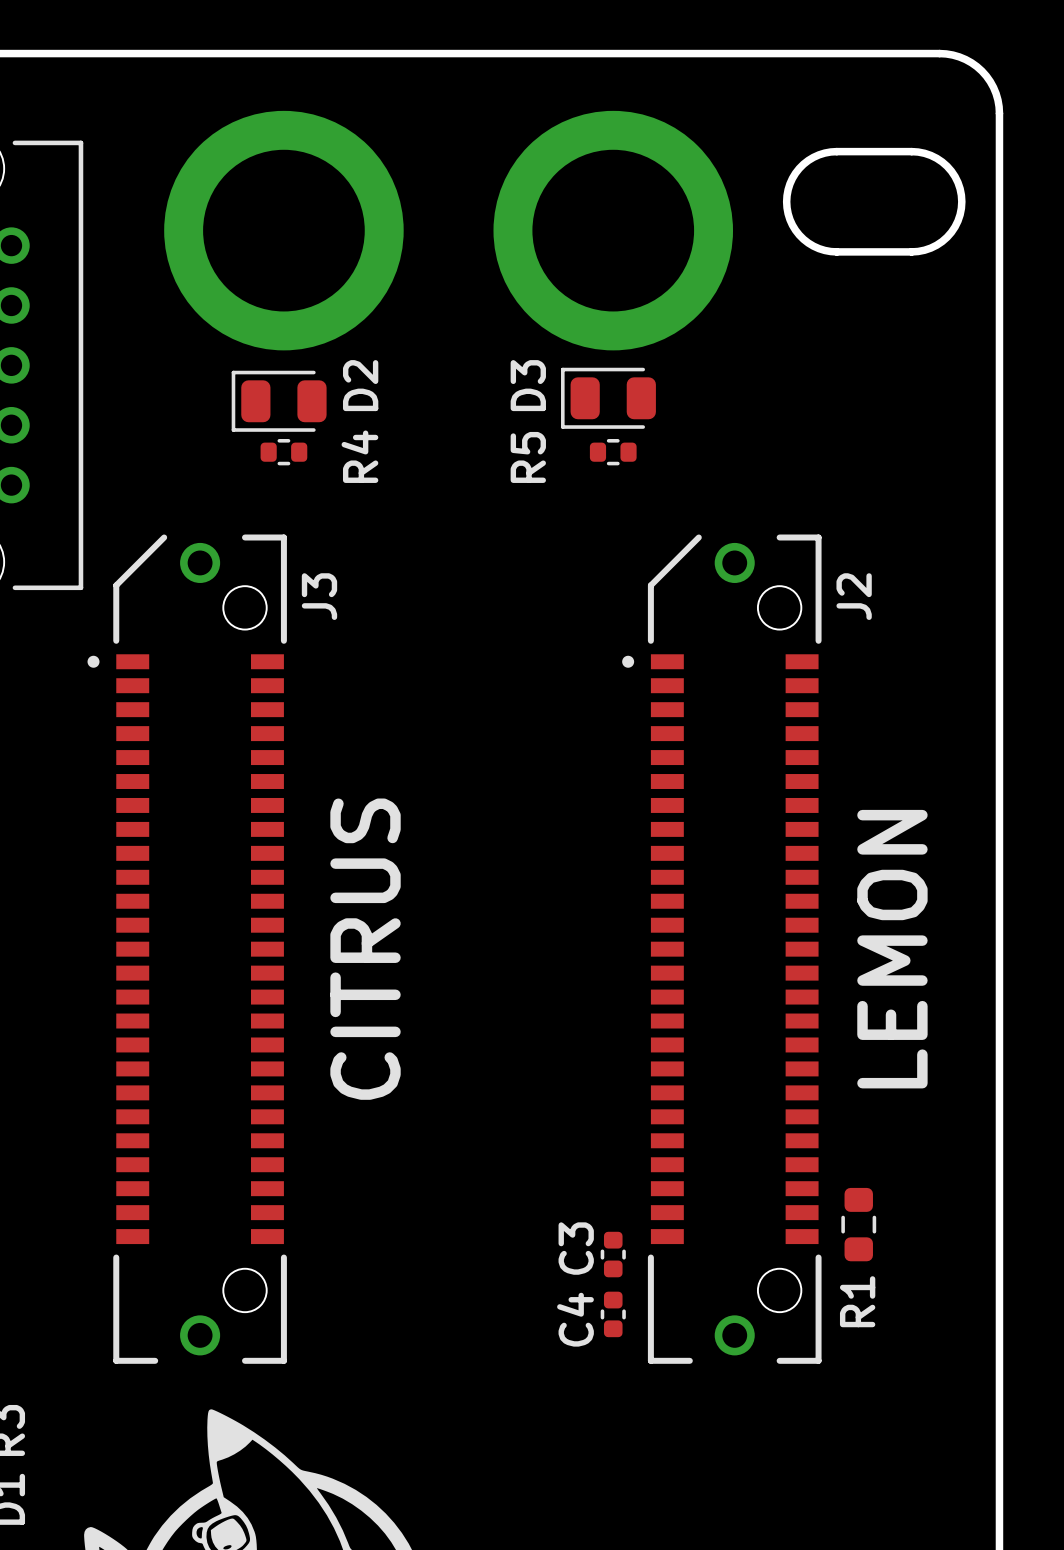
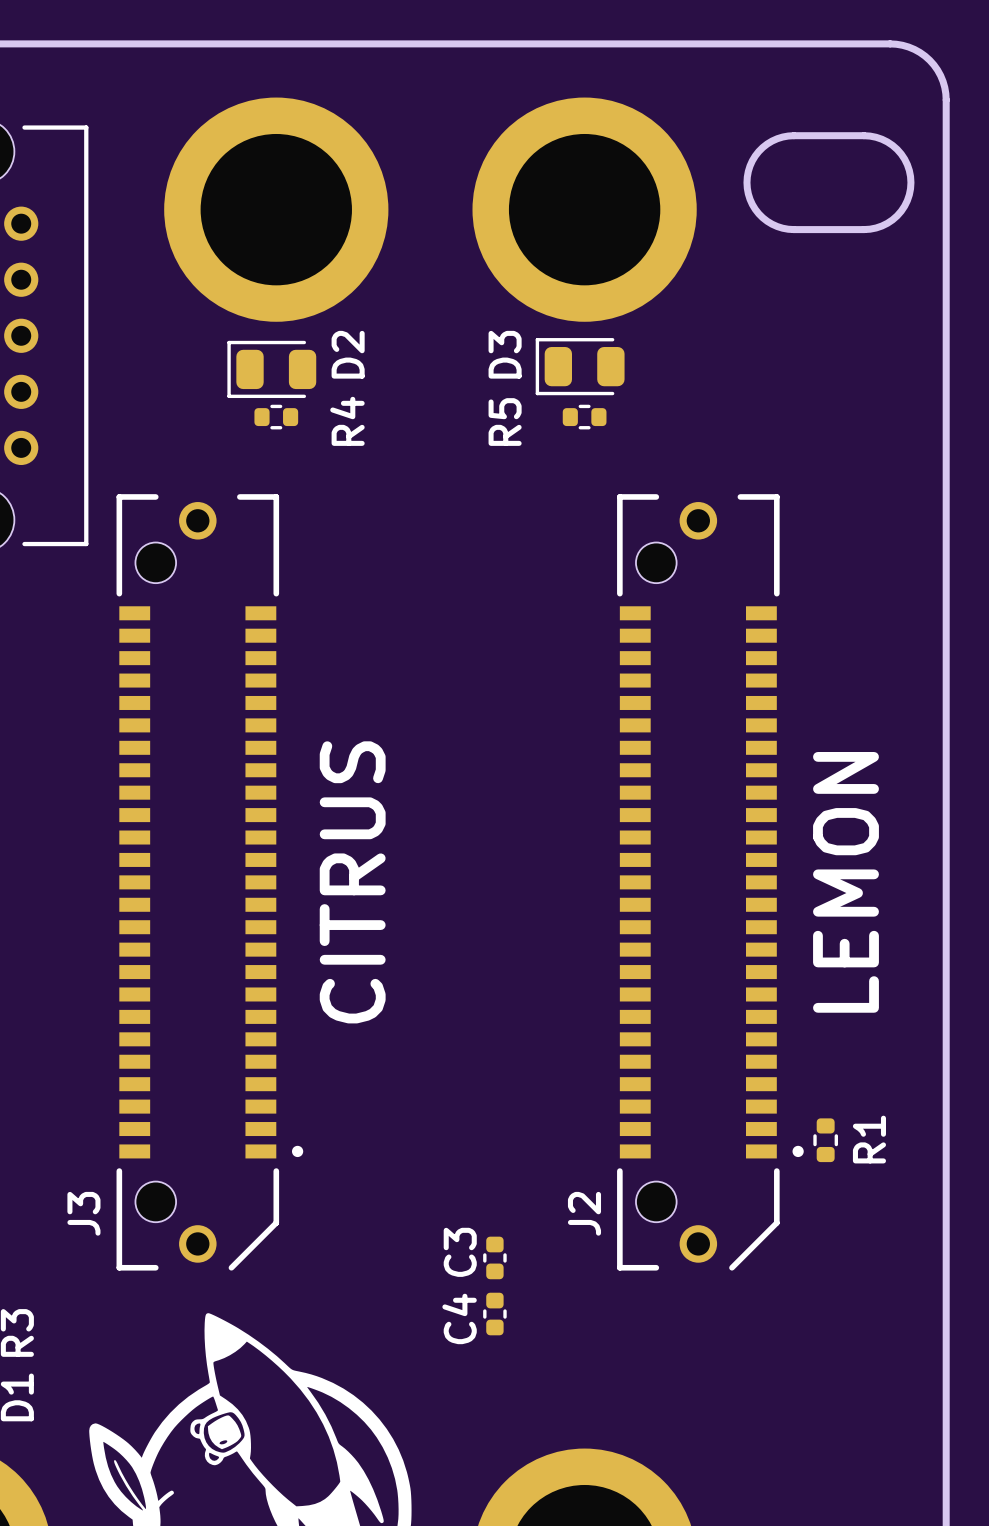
J3 rotation: 0° (187, 949) -> 180° (209, 882)
J2 rotation: 0° (721, 949) -> 180° (710, 882)
R1 footprint: [841, 1187, 877, 1262] -> [813, 1118, 839, 1163]
C3 position: (613, 1254) -> (494, 1257)
R1 name position: R1 (857, 1301) -> R1 (869, 1139)
C4 position: (613, 1314) -> (494, 1314)

